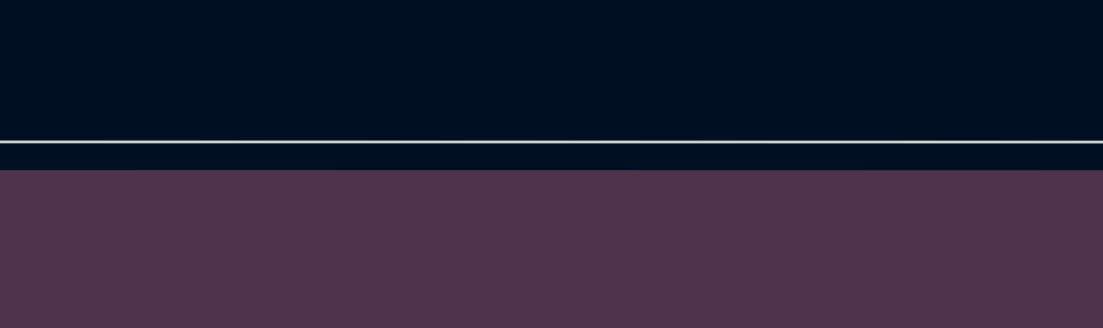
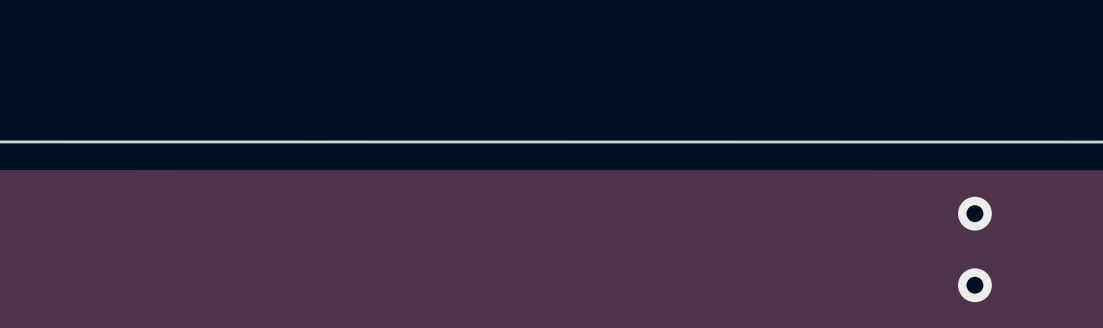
via: none -> (974, 213)
via: none -> (974, 285)

